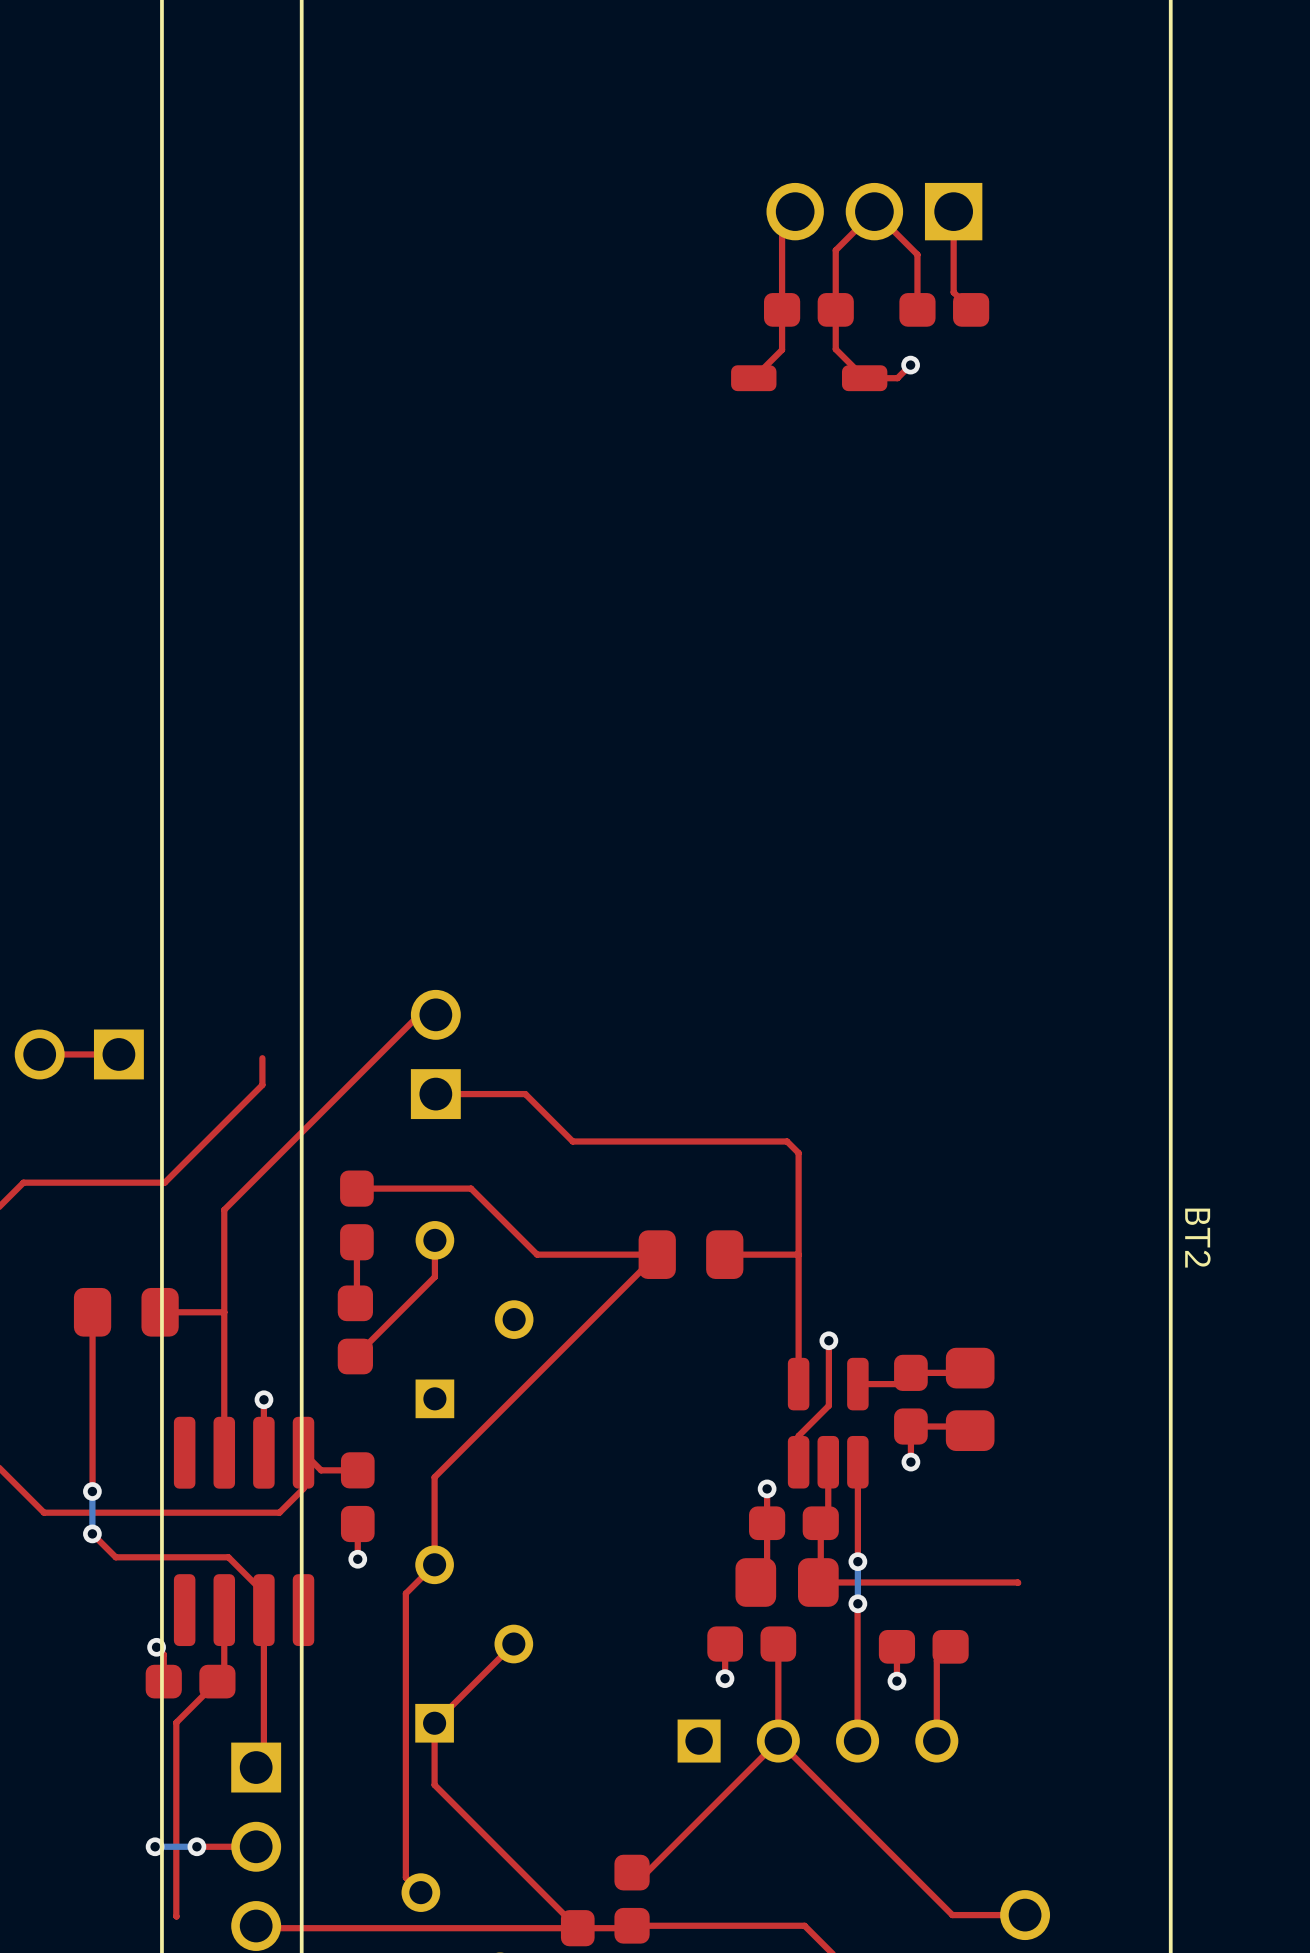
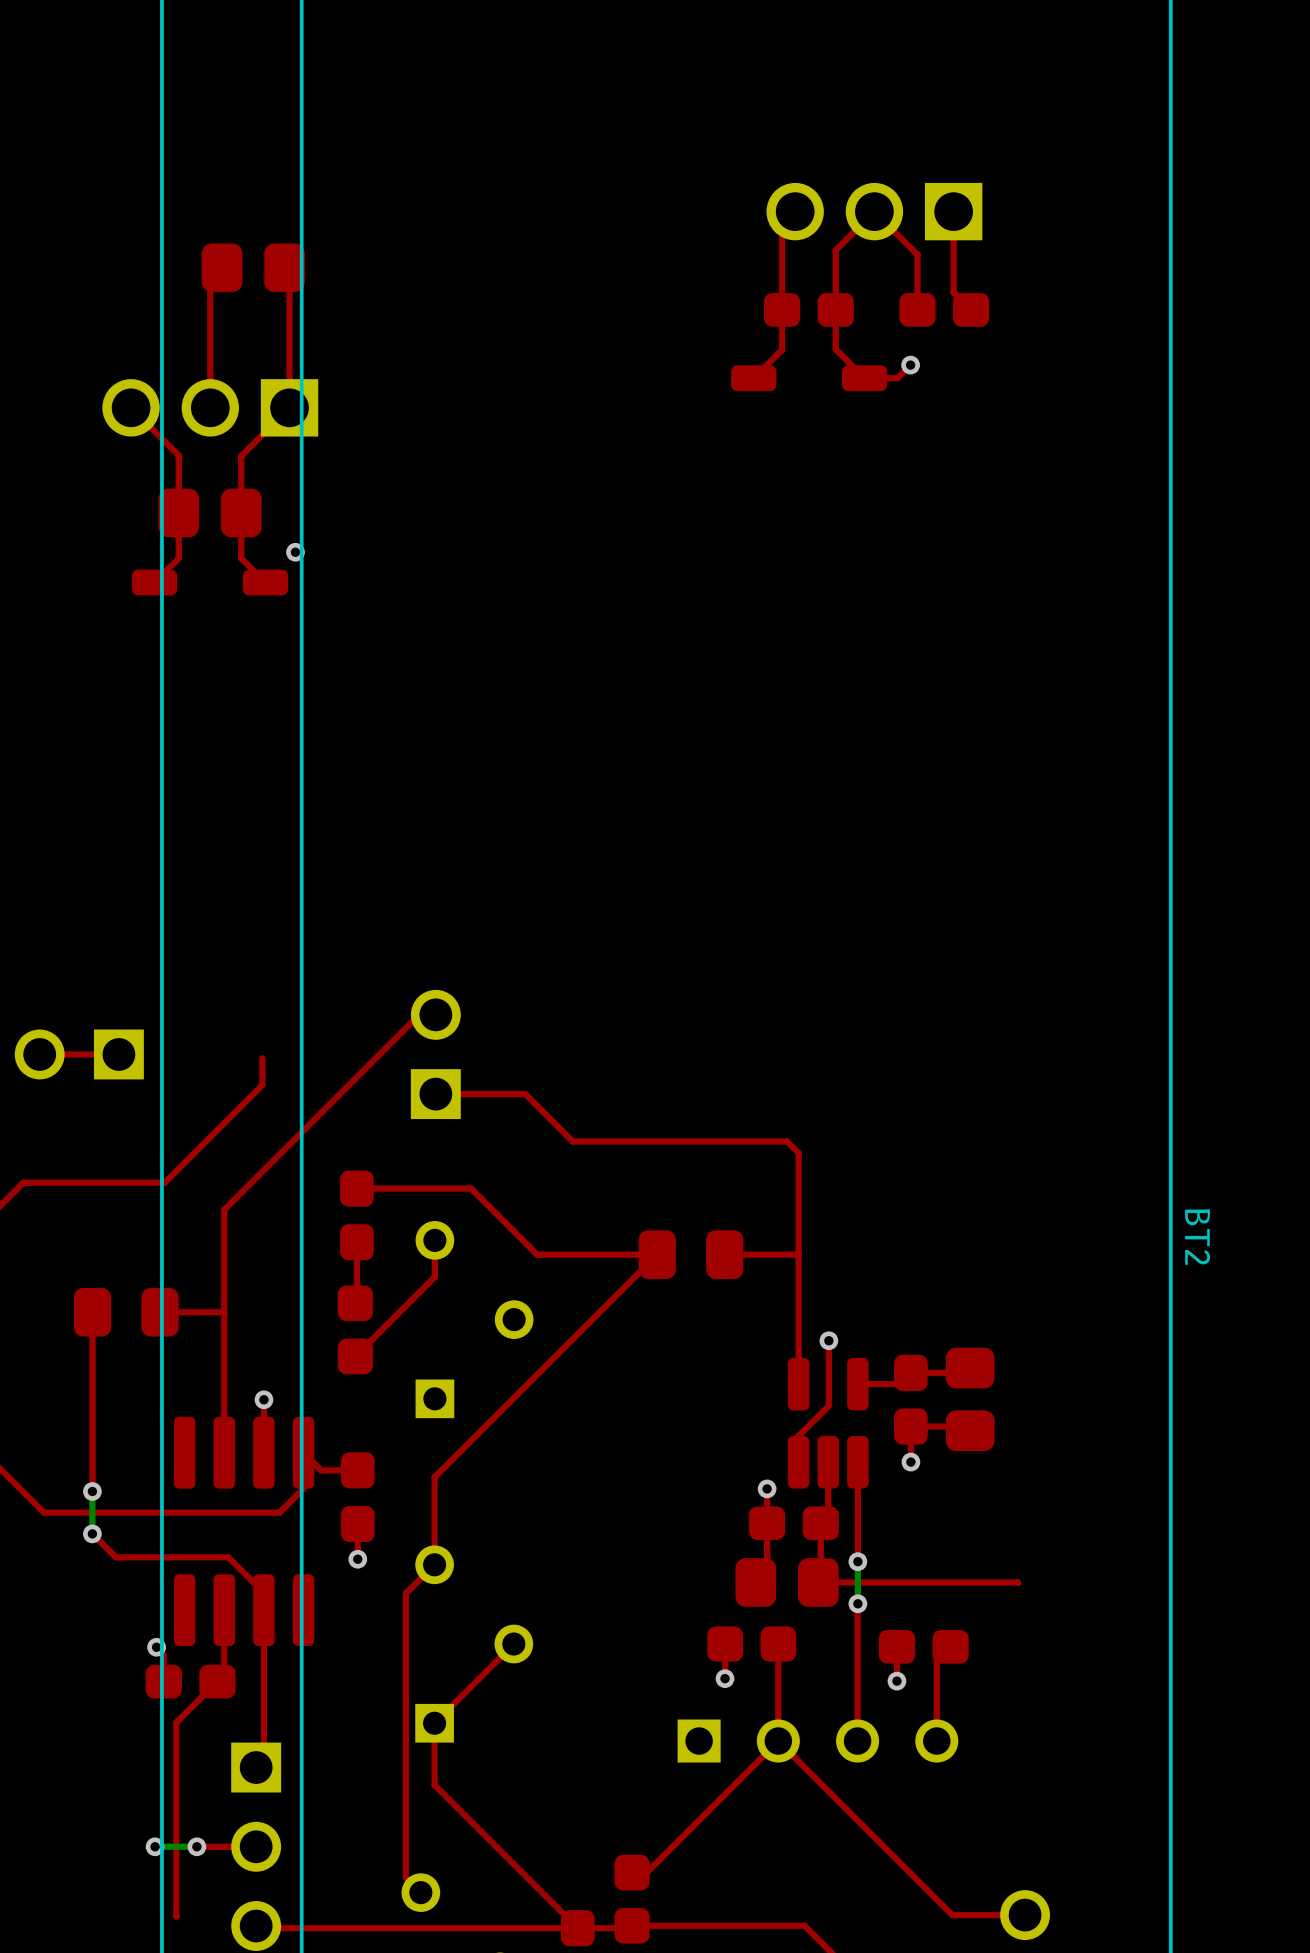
top track: none -> (222, 267) (210, 279) (210, 407)
part: none -> (253, 267)
top track: none -> (284, 267) (289, 272) (289, 407) (241, 456) (241, 558) (265, 582)
top track: none -> (131, 407) (178, 455) (178, 558) (154, 582)
part: none -> (210, 407)
part: none -> (210, 512)
via: none -> (295, 552)
part: none -> (210, 582)

